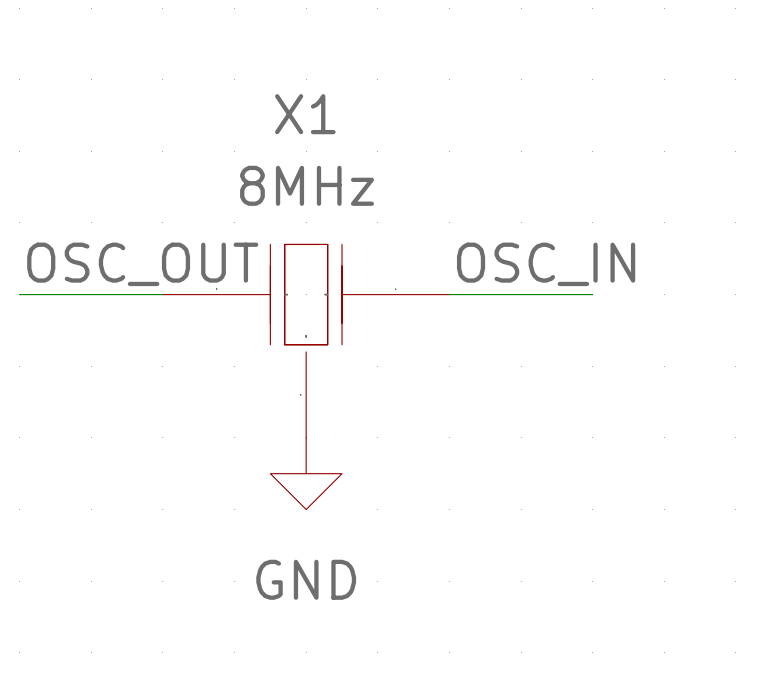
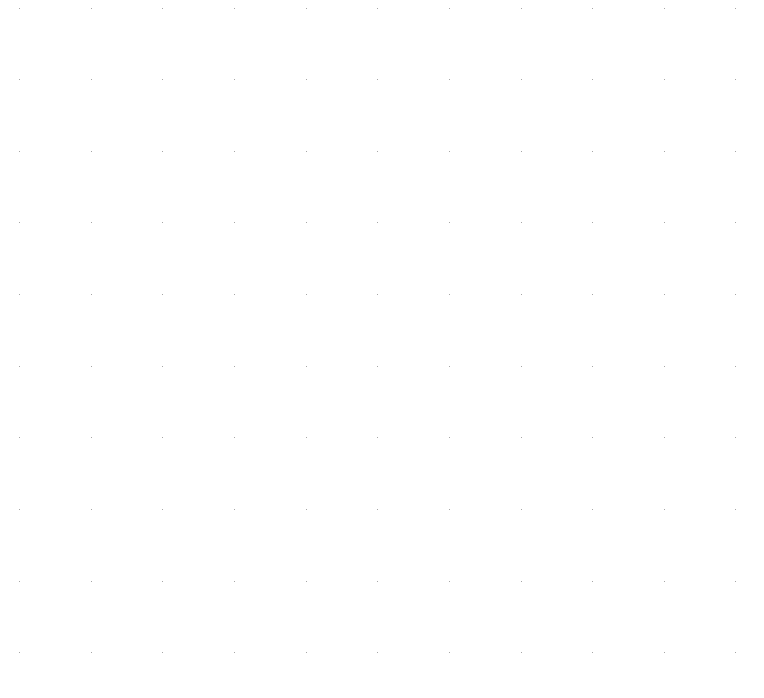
label: OSC_OUT (142, 264) -> none
label: OSC_IN (546, 264) -> none
wire: (19, 294) (162, 294) -> none
wire: (449, 294) (592, 294) -> none
X1: 8MHz (306, 341) -> none
power symbol: GND (306, 473) -> none

